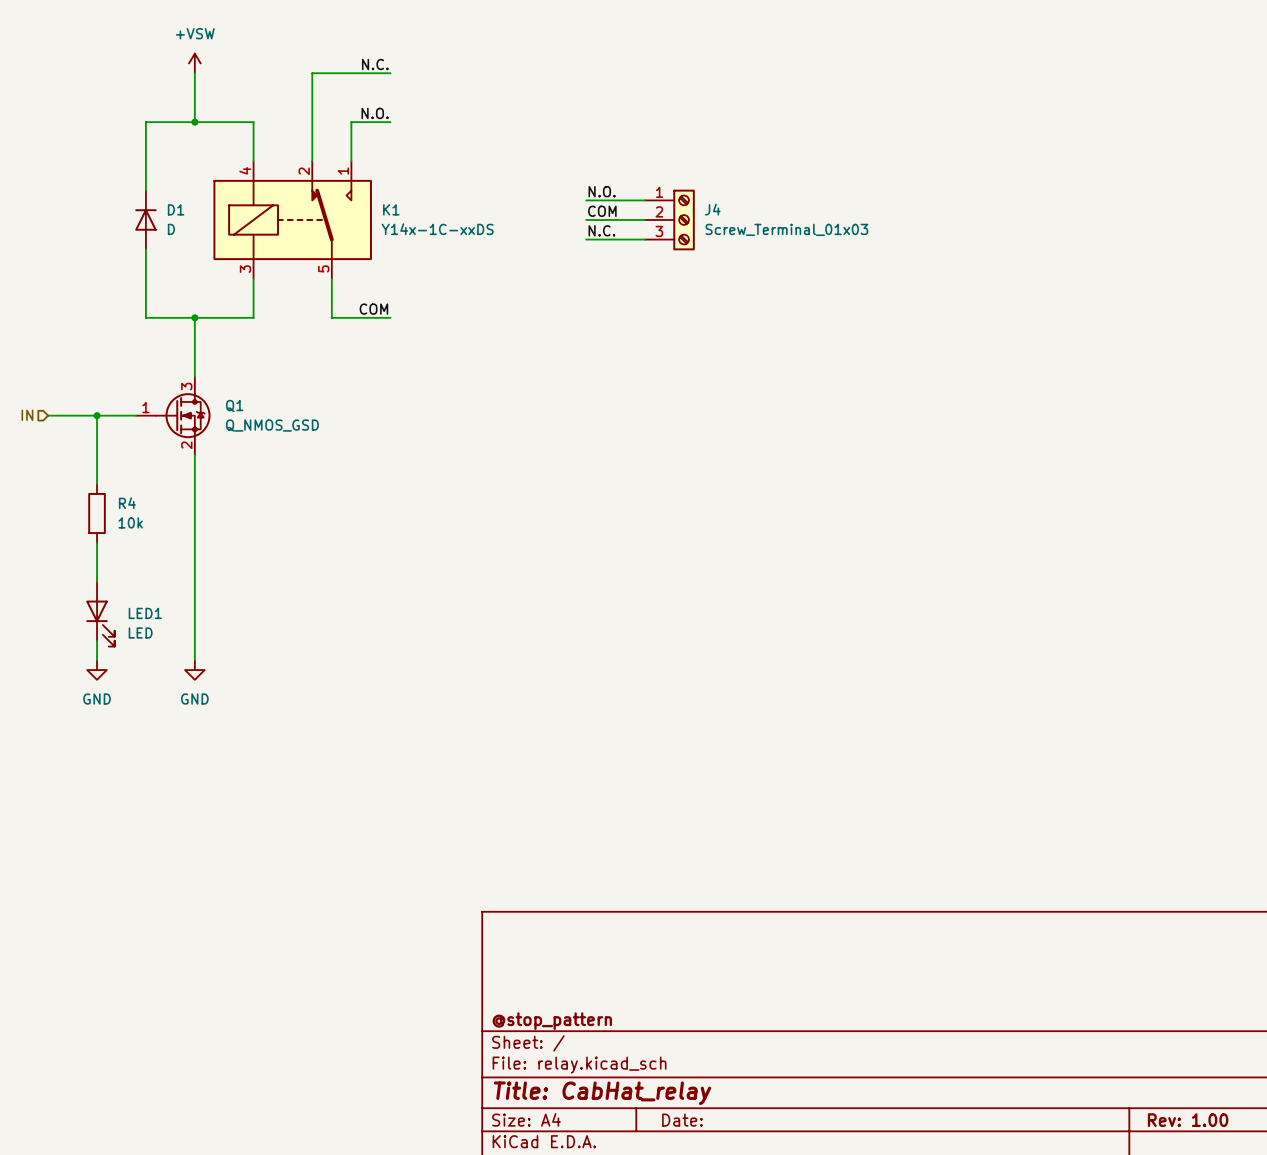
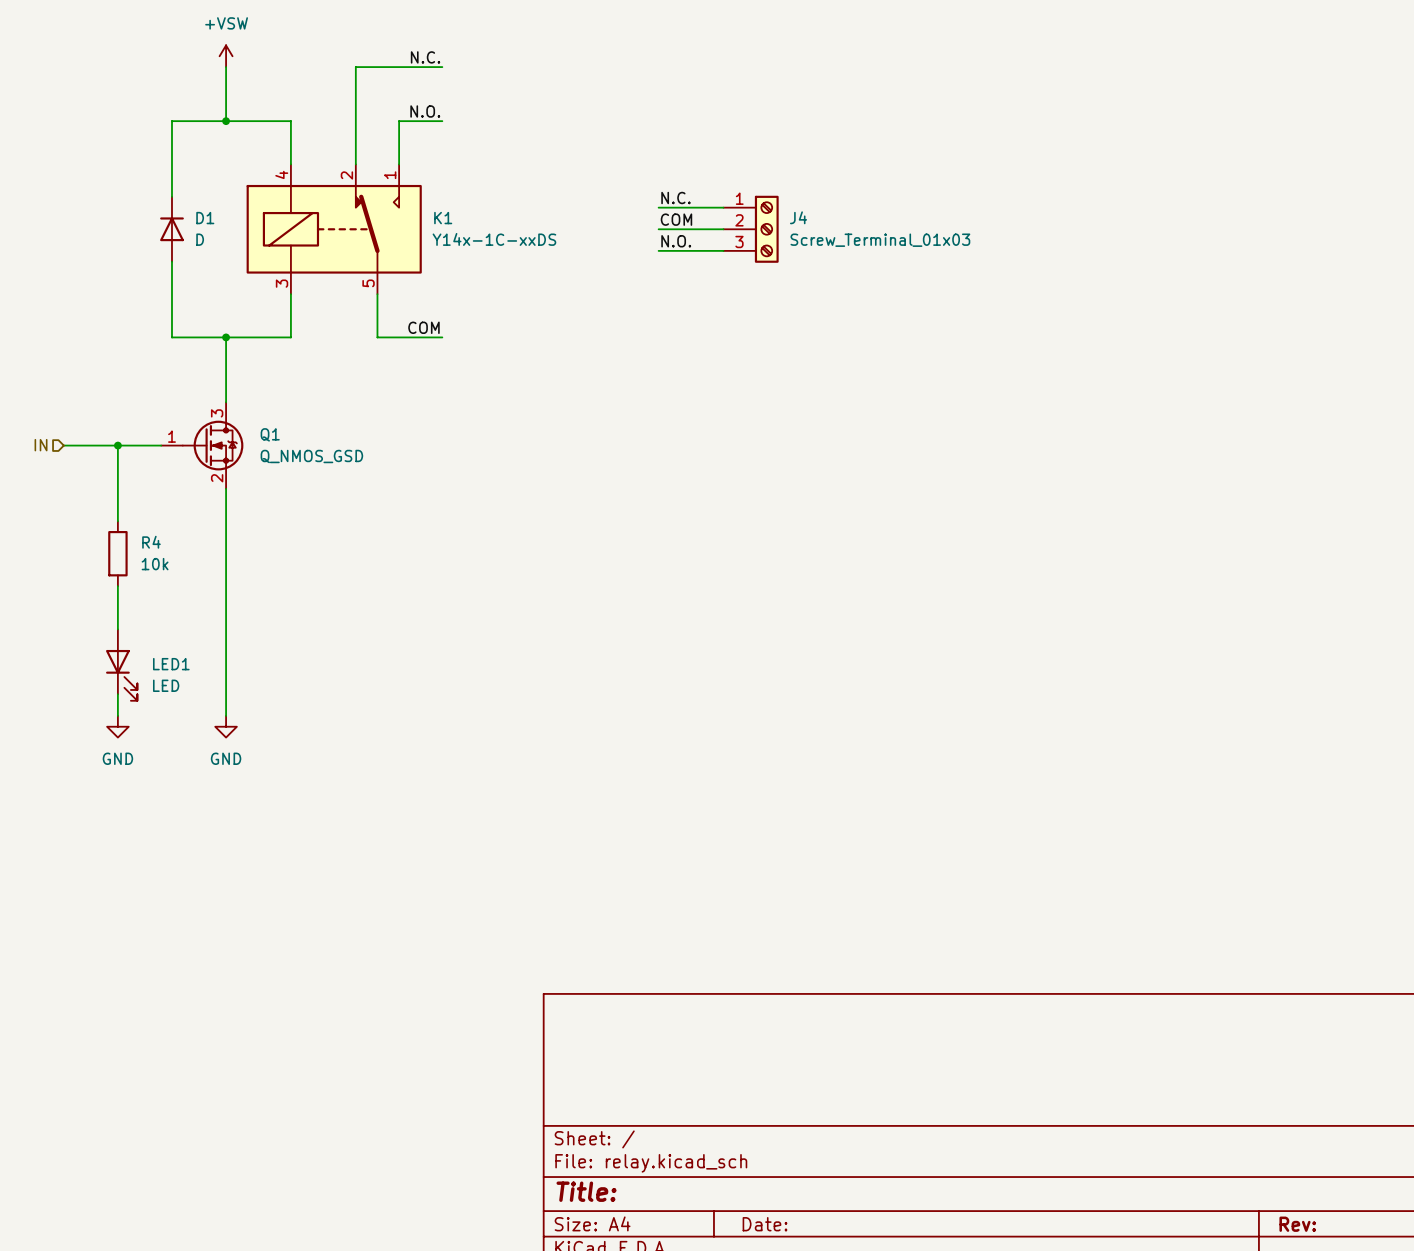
label: N.O. (602, 191) -> N.C. (675, 198)
label: N.C. (601, 230) -> N.O. (676, 241)
title block: @stop_pattern (552, 1021) -> none
title block: Title: CabHat_relay (602, 1093) -> Title: (586, 1191)
title block: Rev: 1.00 (1188, 1120) -> Rev: (1297, 1224)

